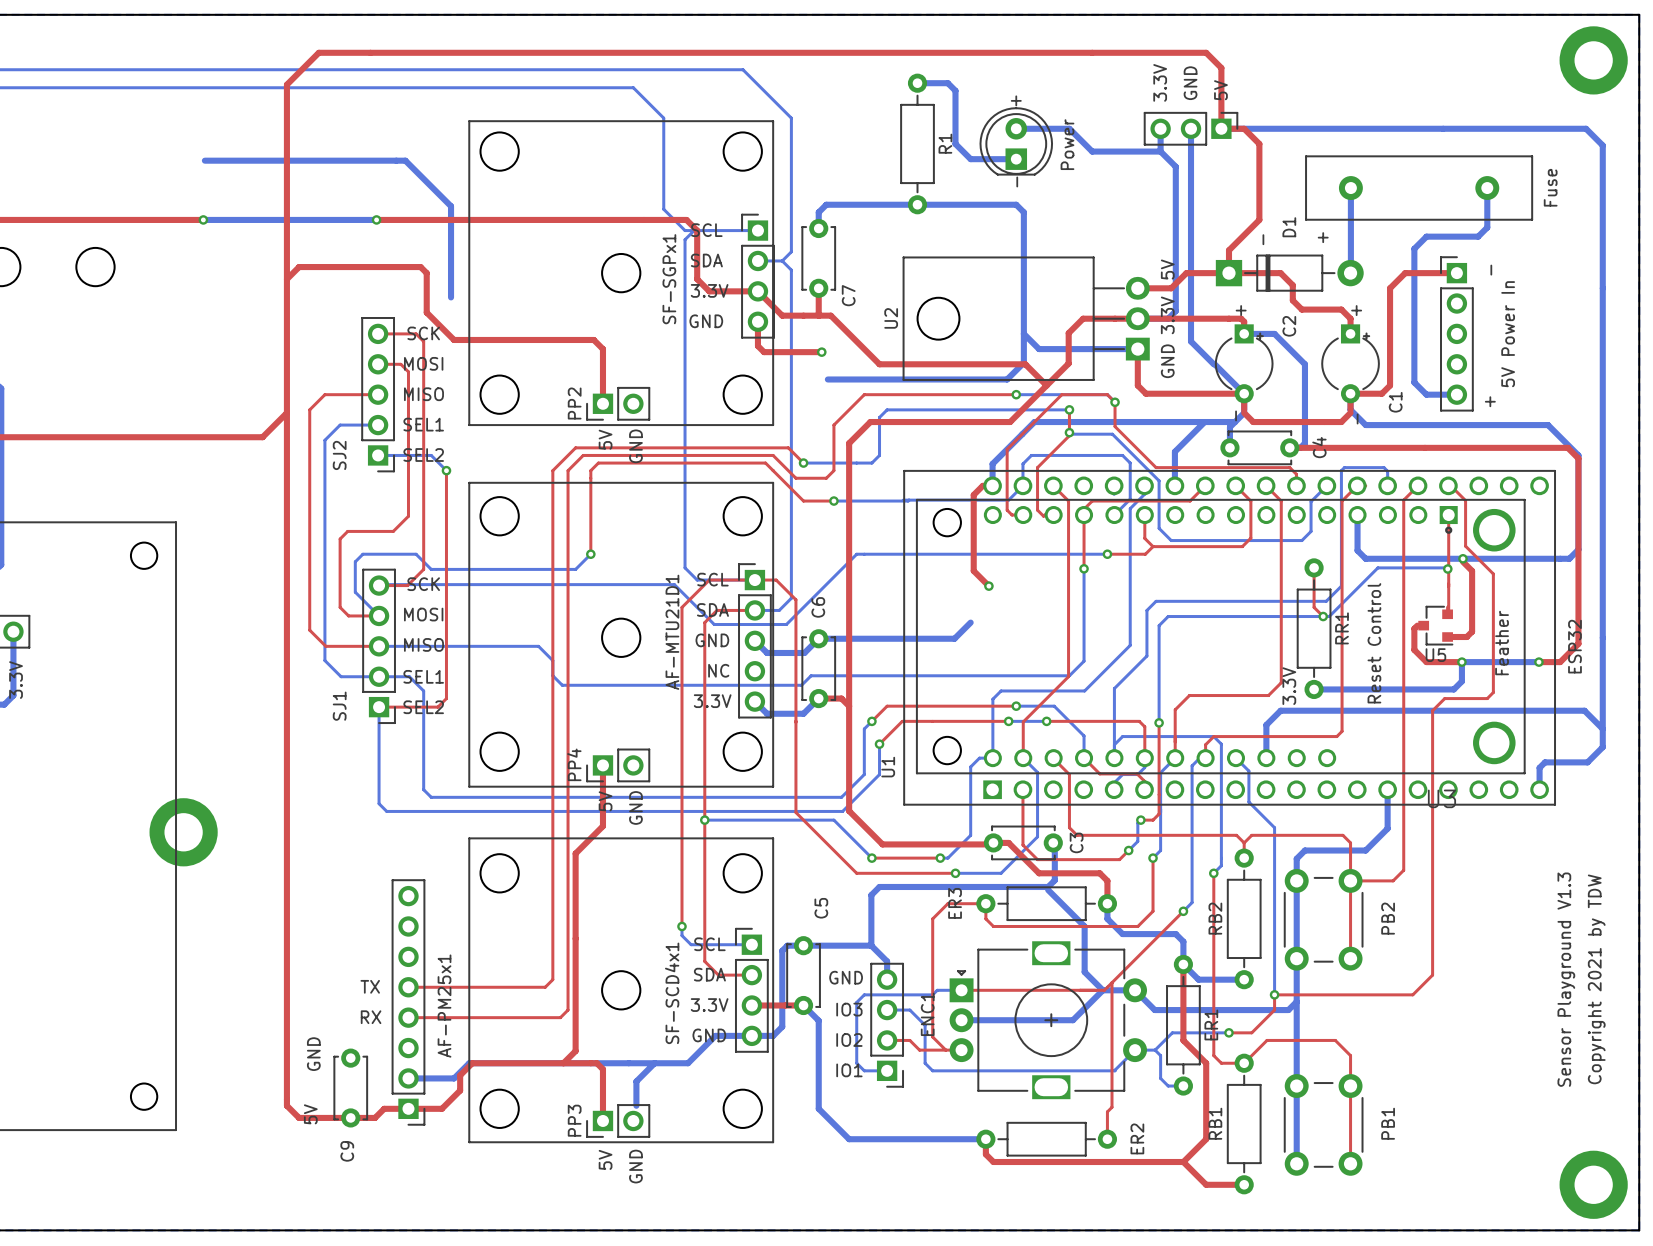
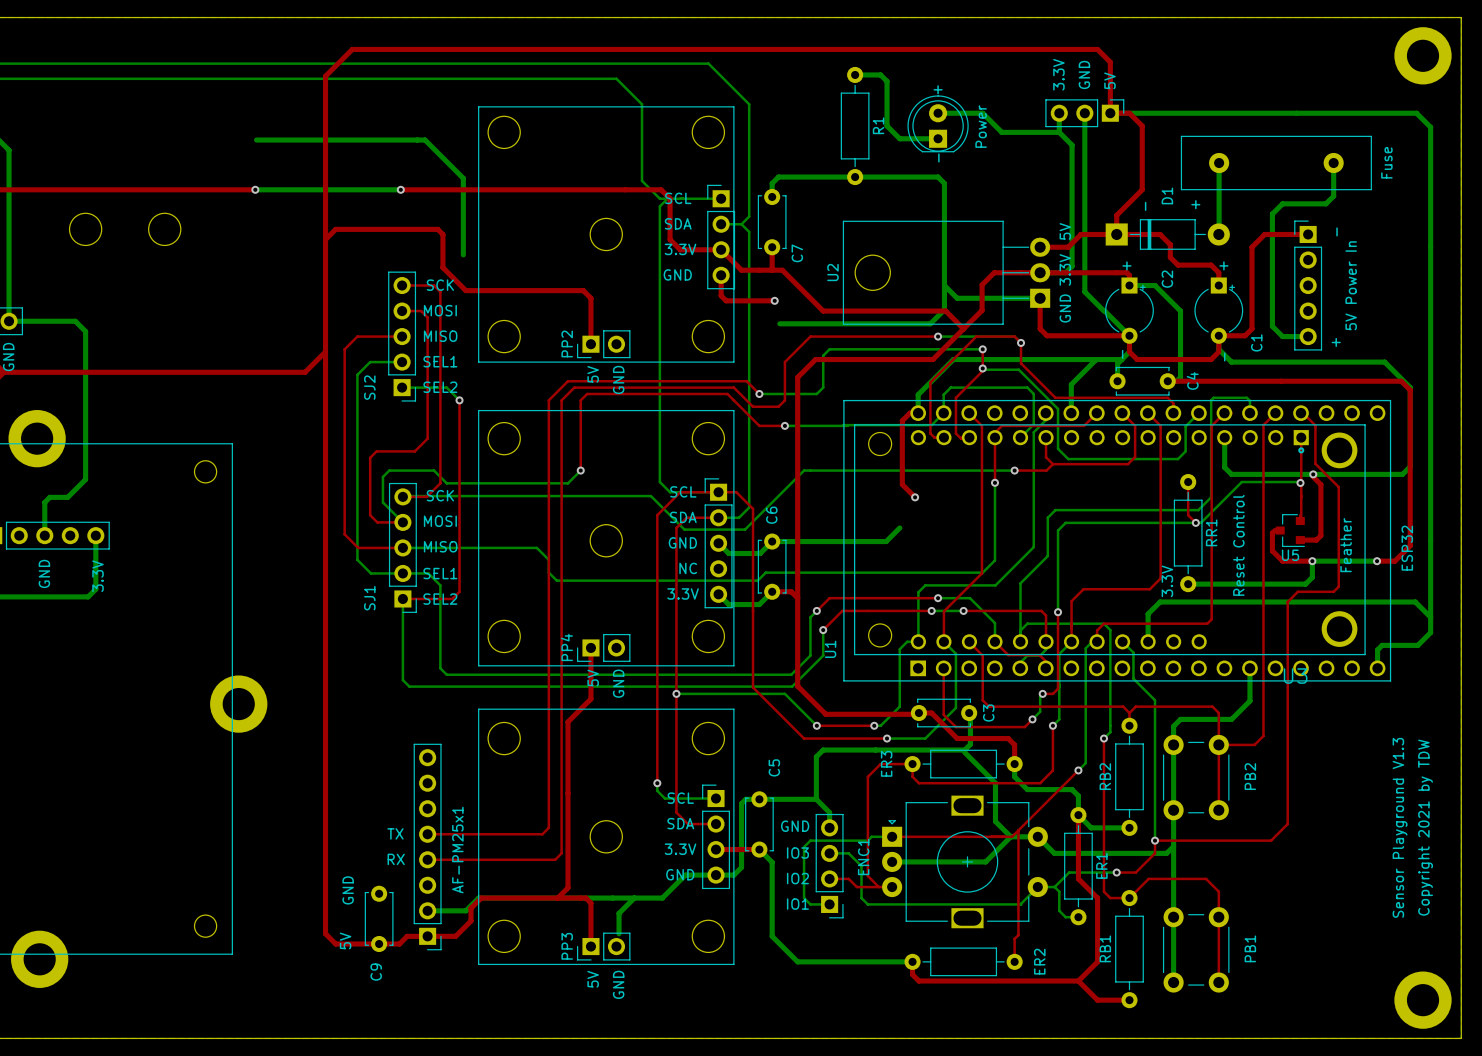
SF-SGPx1 name: SF-SGPx1 (669, 279) -> none
AF-MTU21D1 name: AF-MTU21D1 (672, 632) -> none
SF-SCD4x1 name: SF-SCD4x1 (672, 993) -> none

